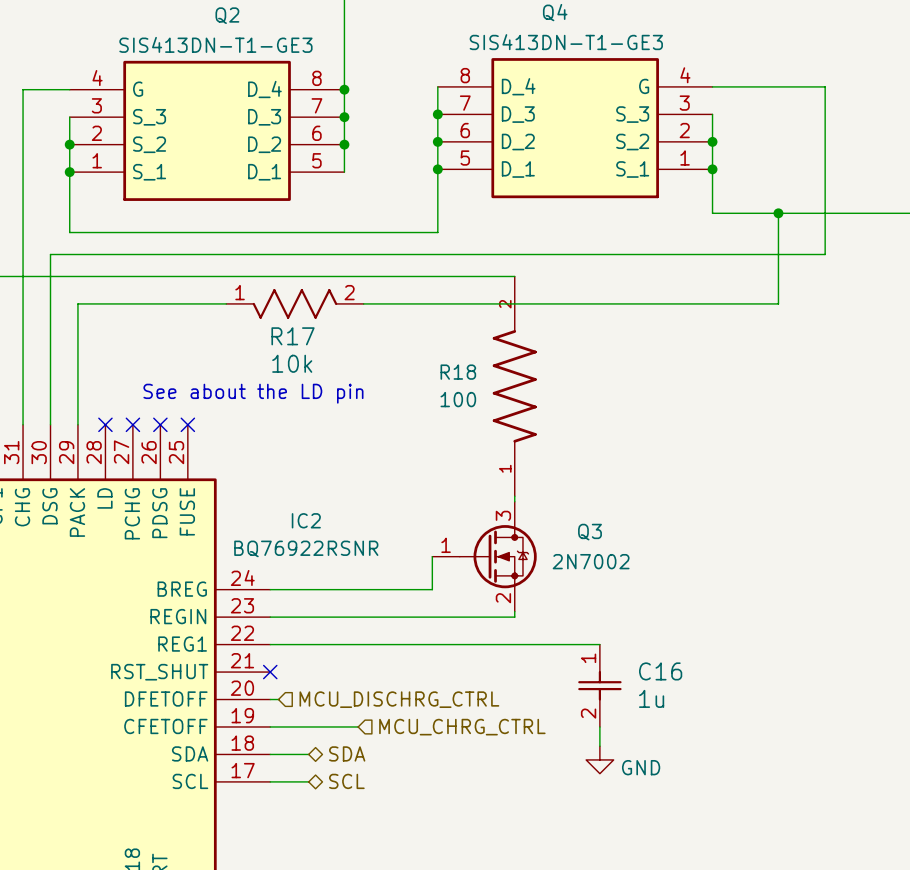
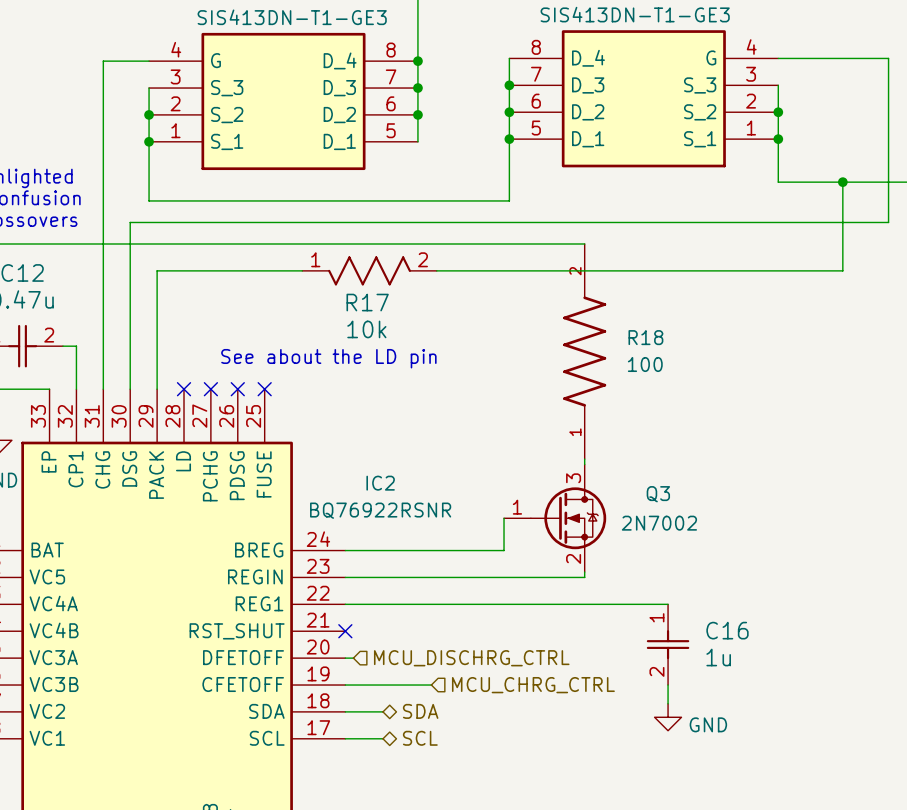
R18 flip: as is (514, 386) -> left-right (584, 351)

